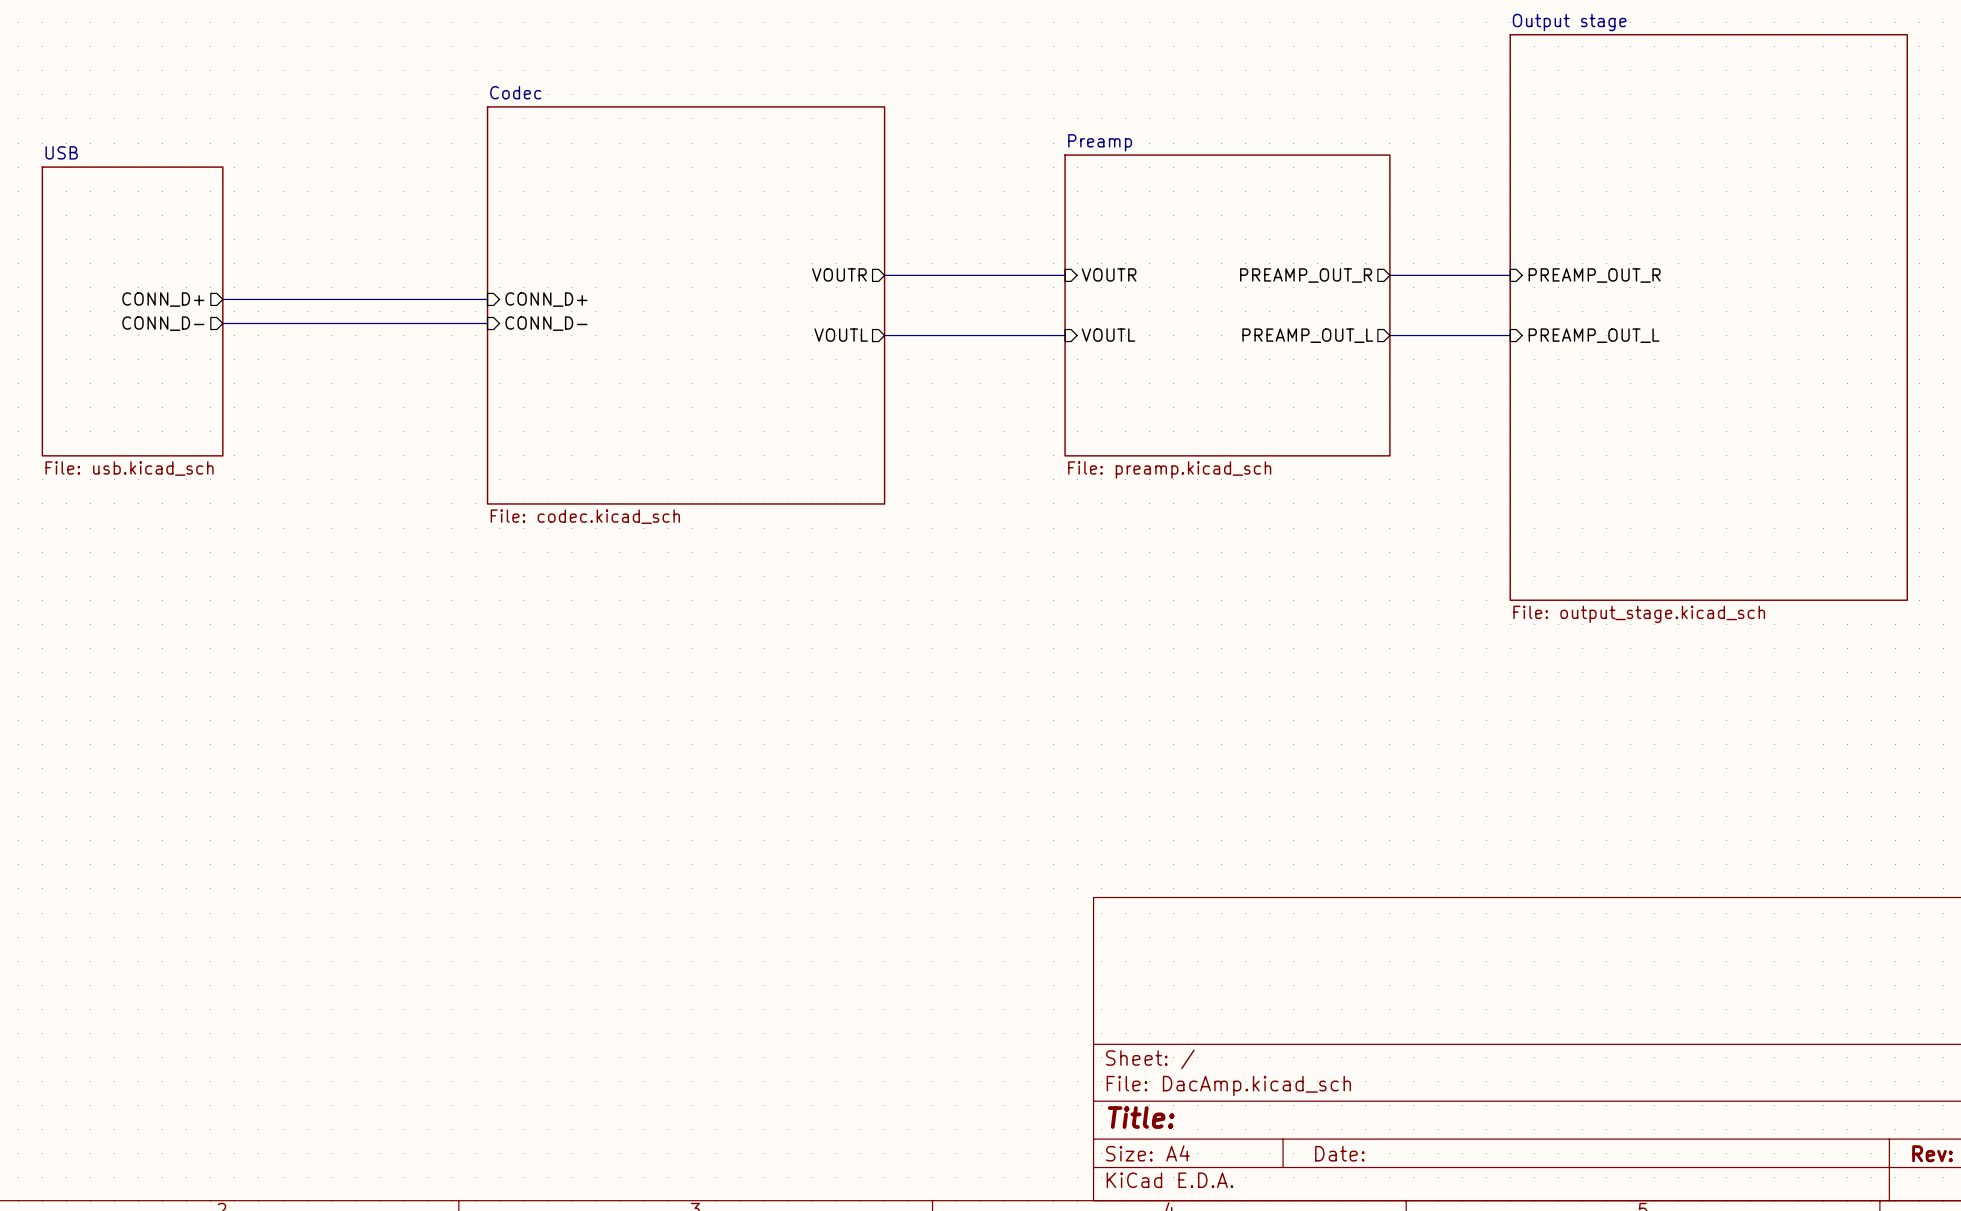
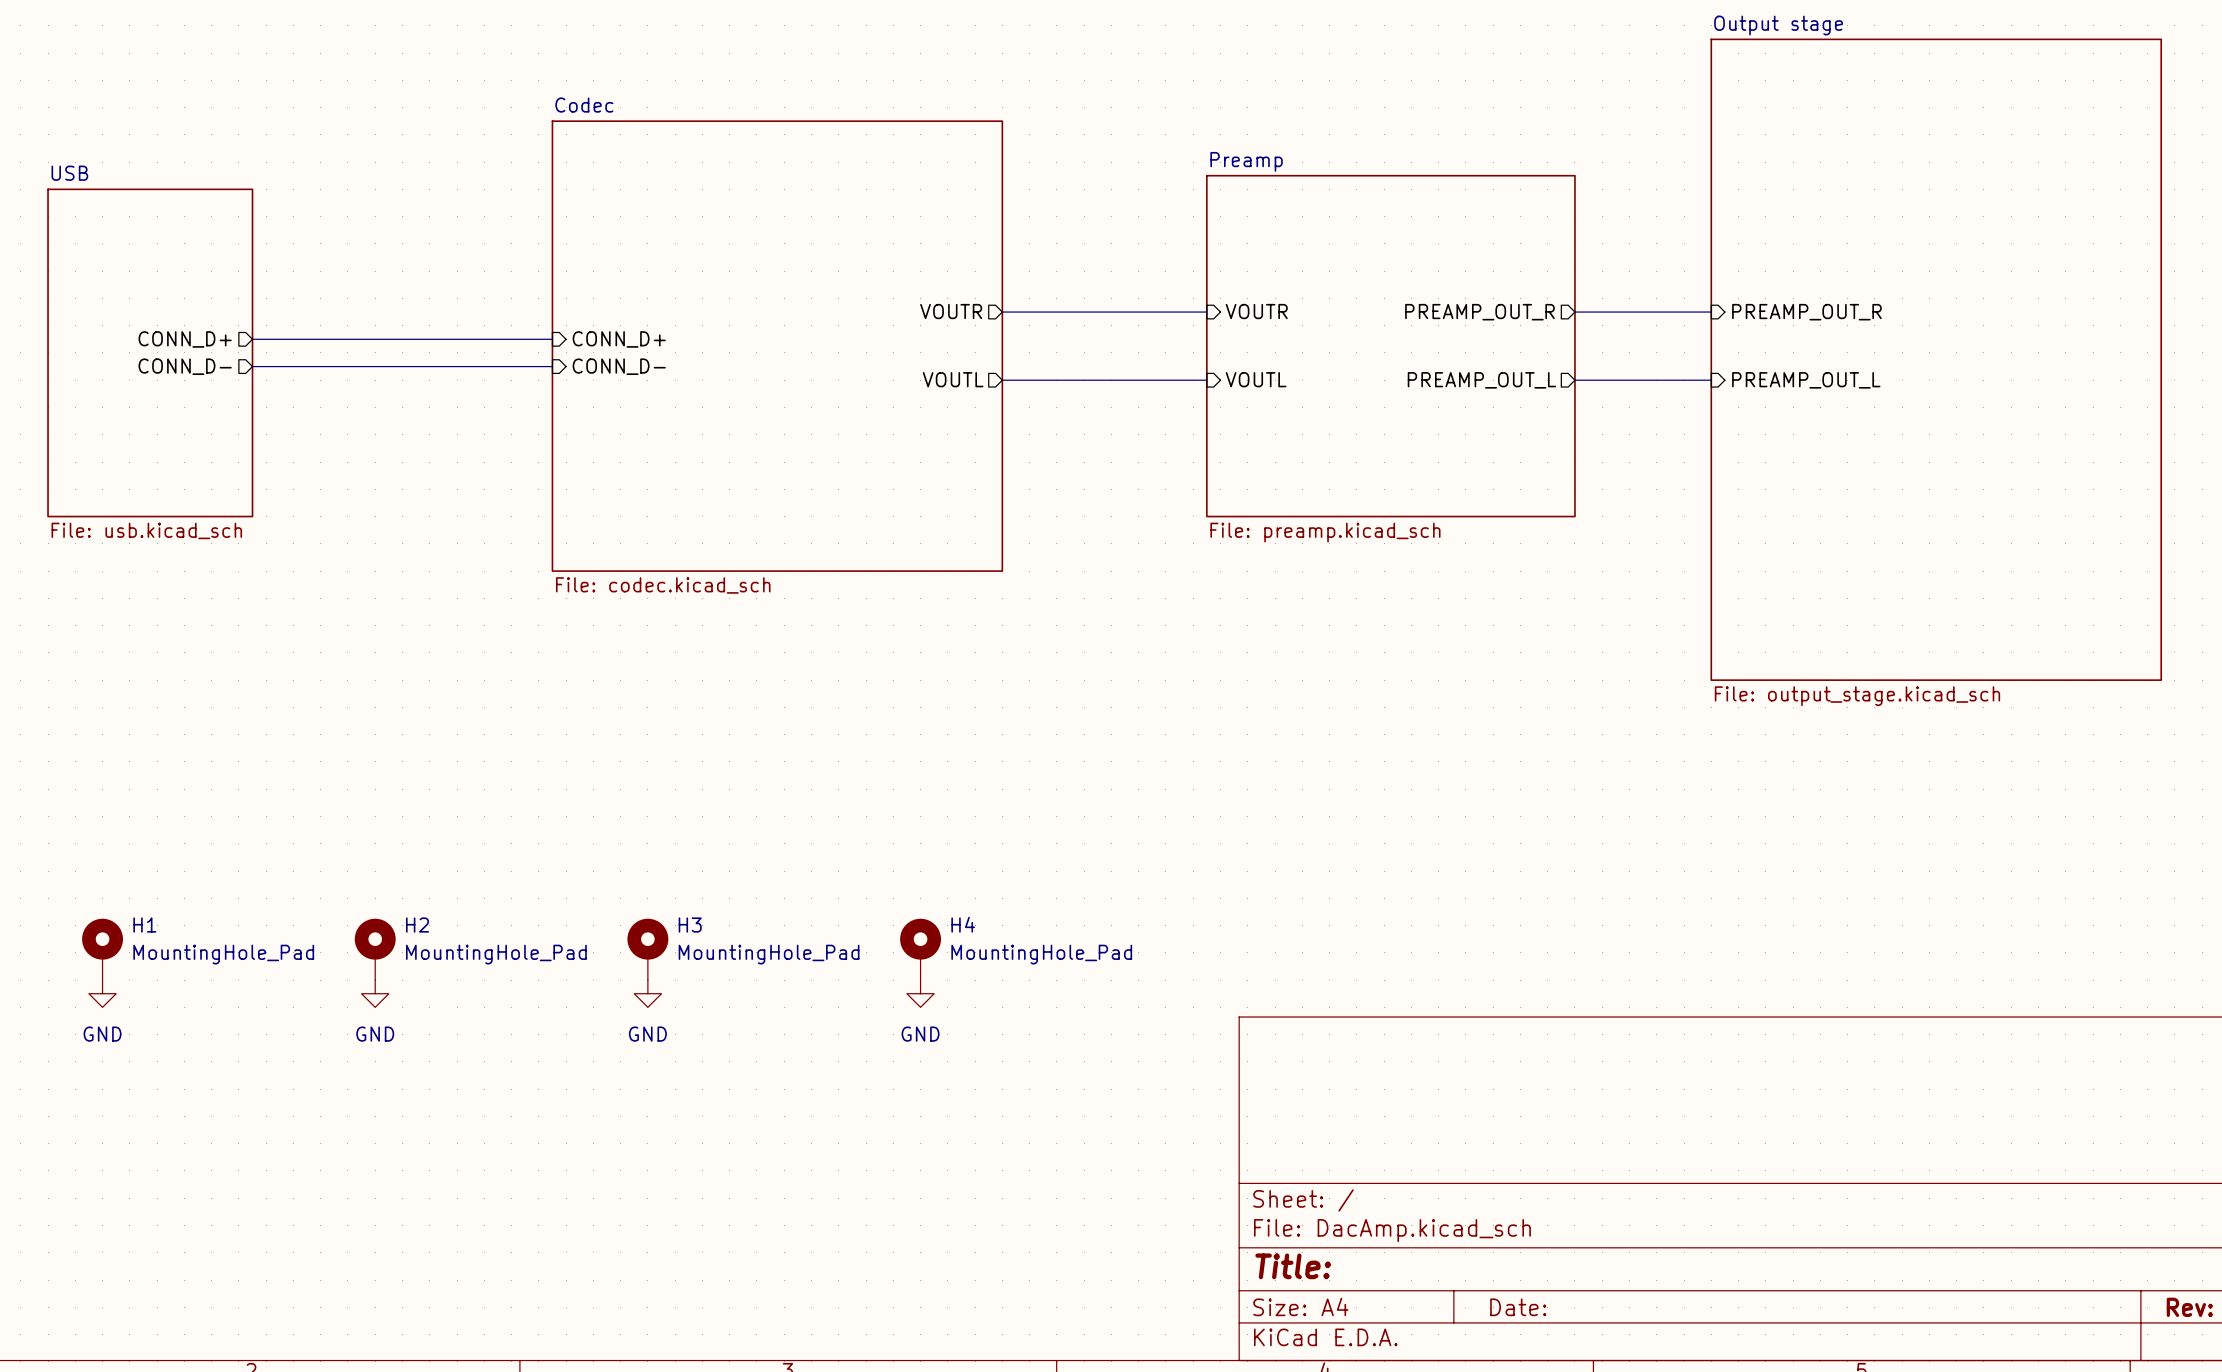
H1: none -> MountingHole_Pad (102, 949)
H2: none -> MountingHole_Pad (375, 949)
H3: none -> MountingHole_Pad (647, 949)
H4: none -> MountingHole_Pad (920, 949)
power symbol: none -> GND (102, 993)
power symbol: none -> GND (375, 993)
power symbol: none -> GND (647, 993)
power symbol: none -> GND (920, 993)

